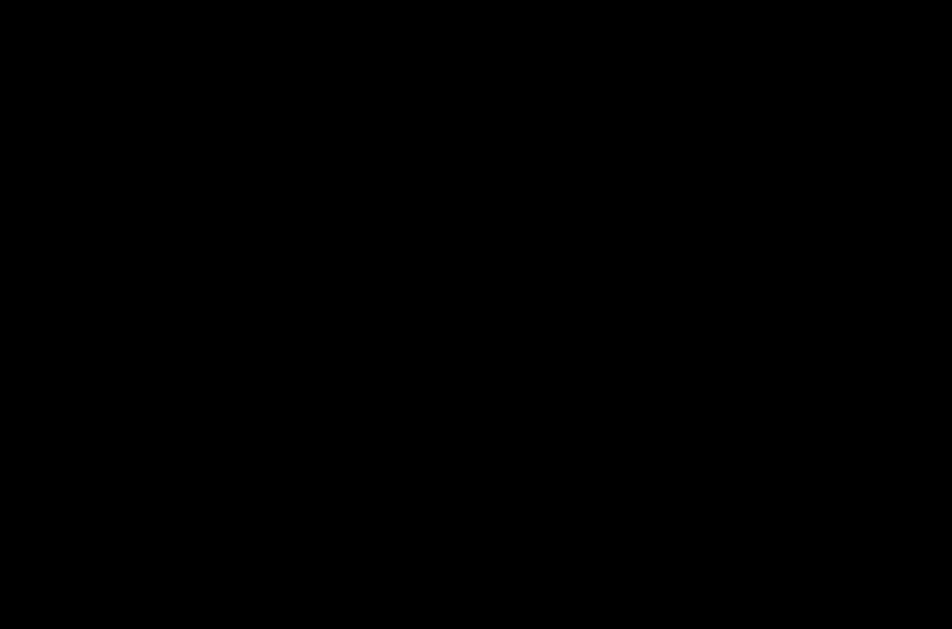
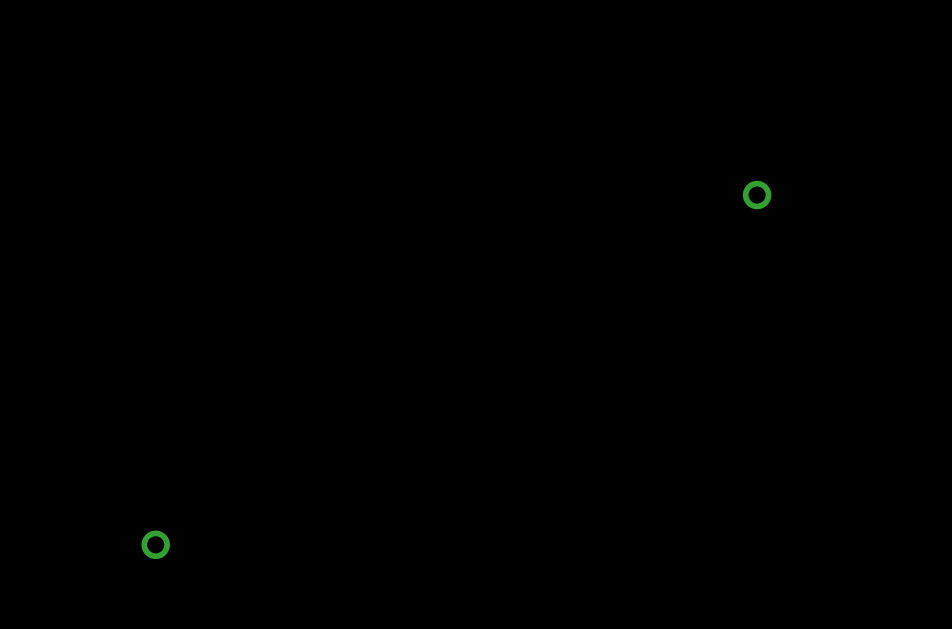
via: none -> (757, 195)
via: none -> (155, 544)

